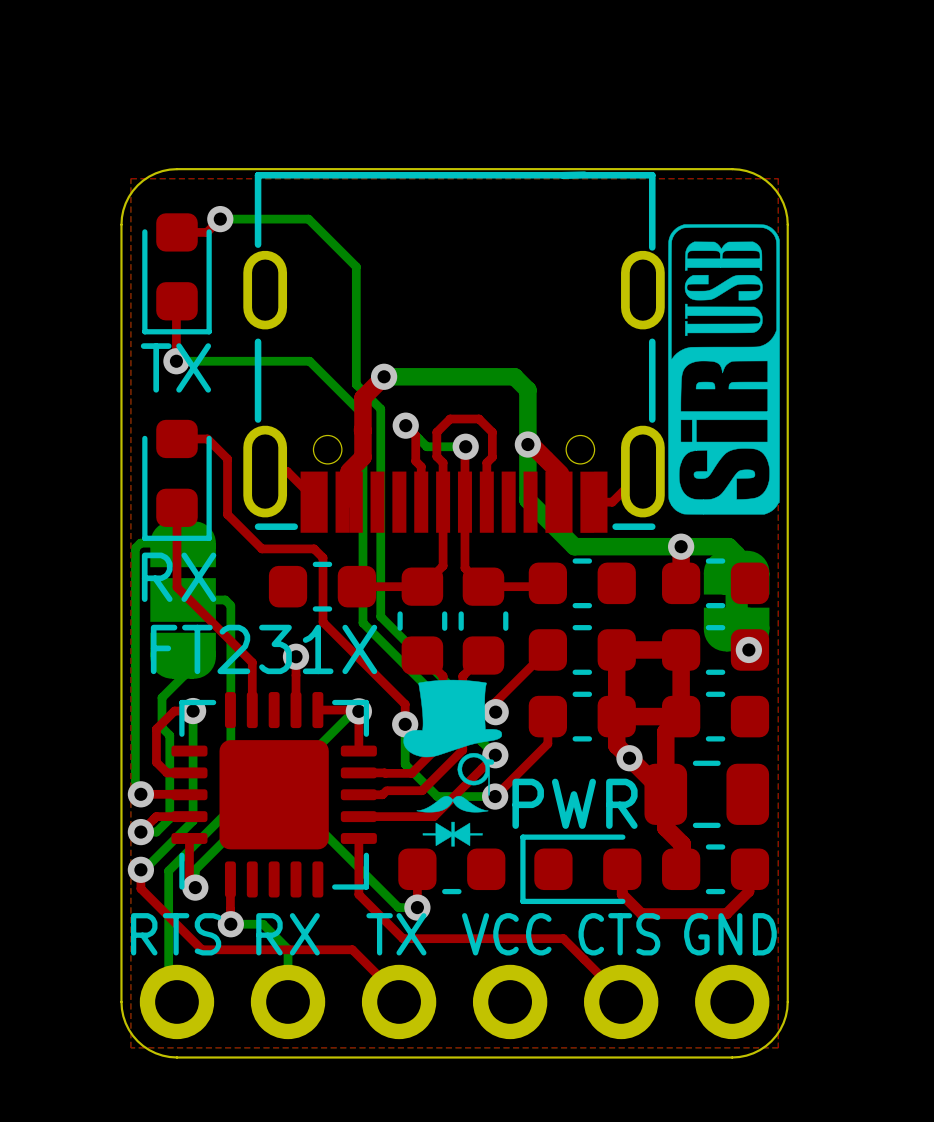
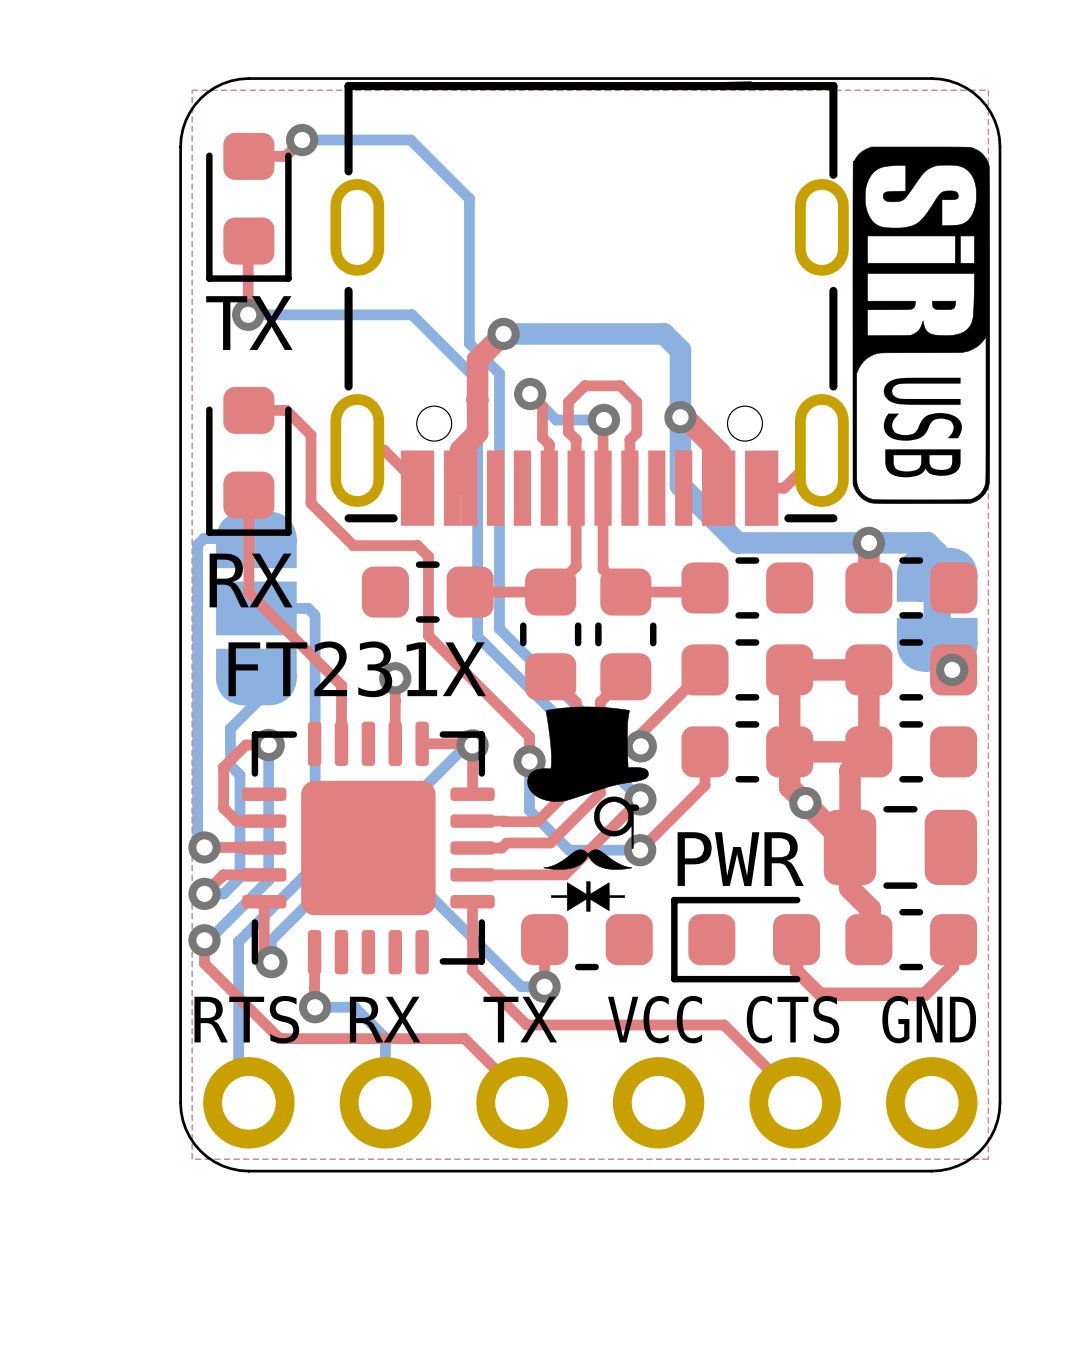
drawing shape: [668, 224, 780, 515] -> [852, 146, 990, 504]
text: none -> USB (922, 427)

